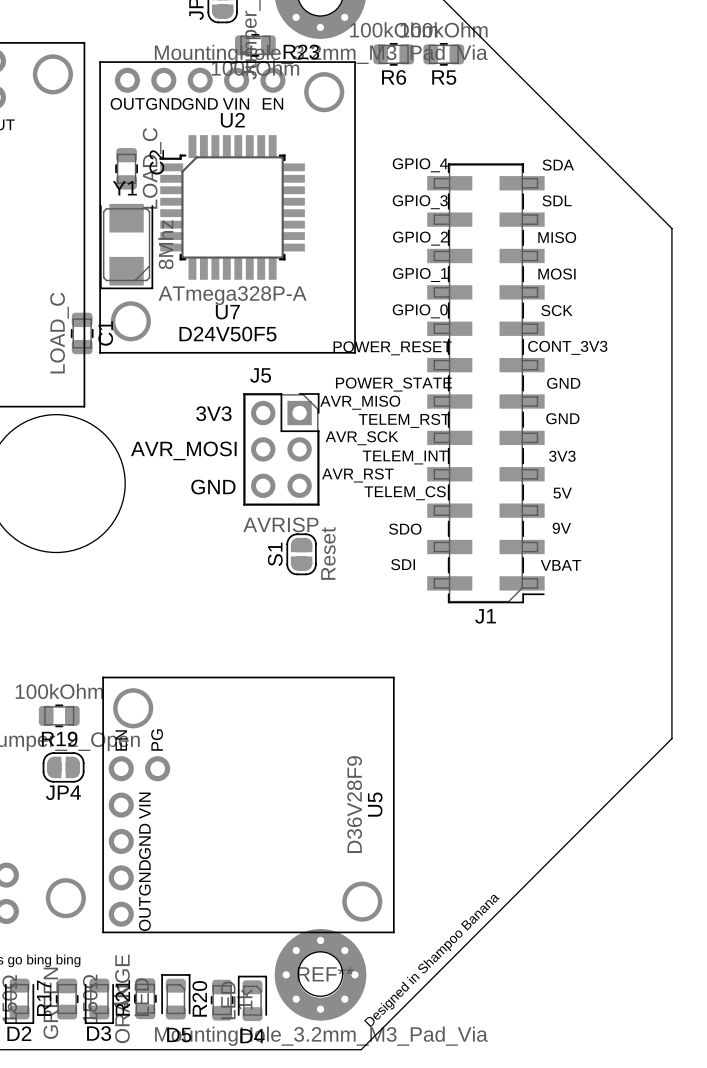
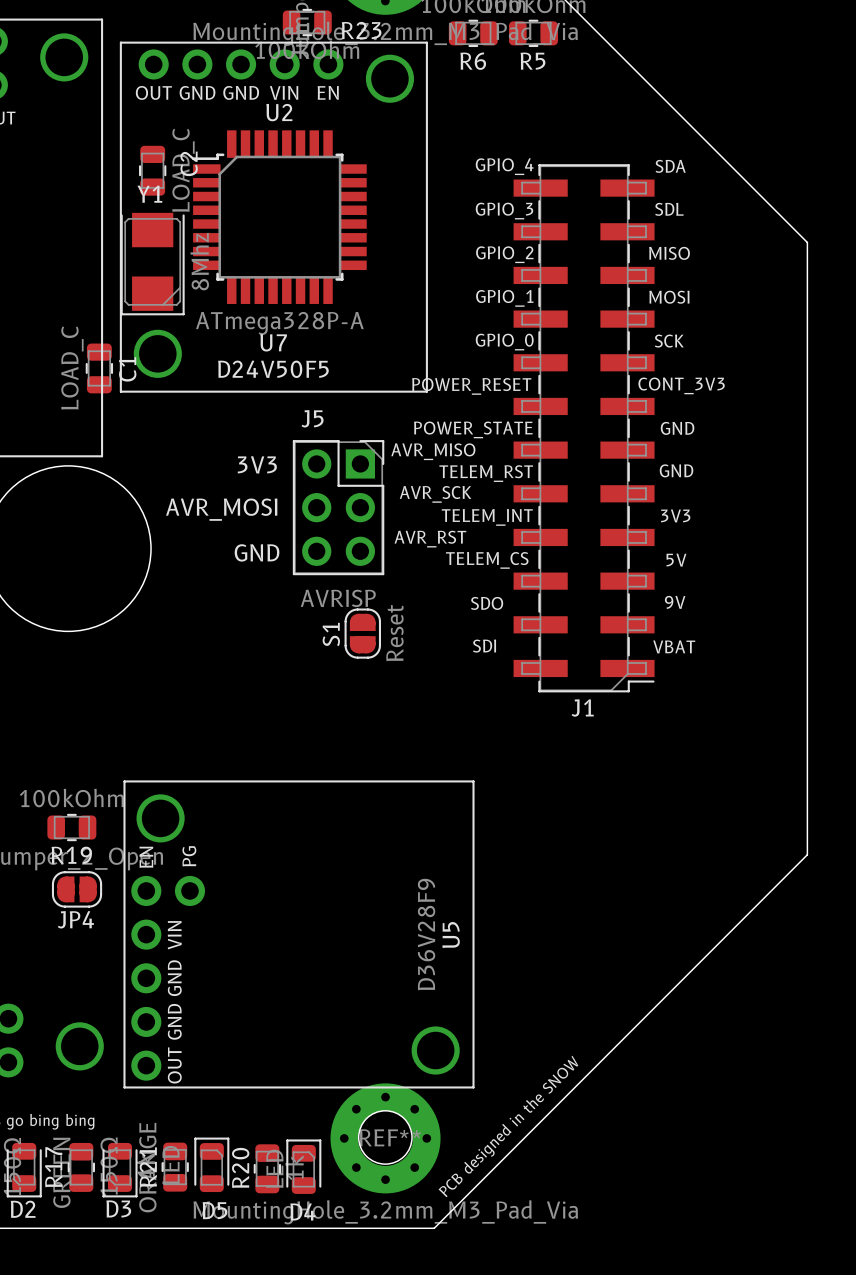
text: Designed in Shampoo Banana (431, 961) -> PCB designed in the SNOW (508, 1126)

